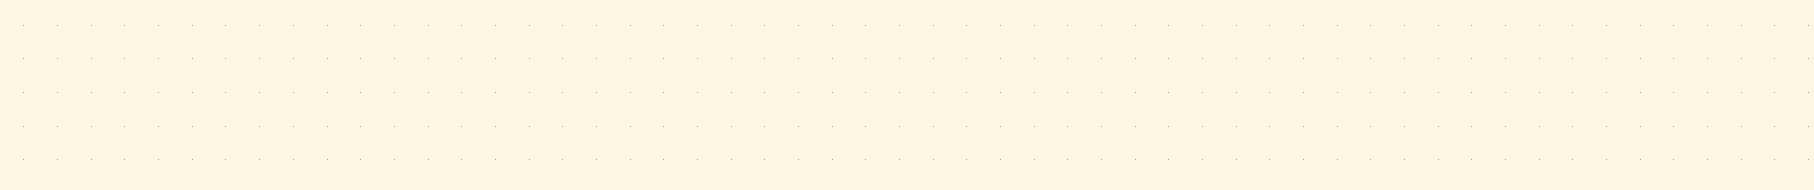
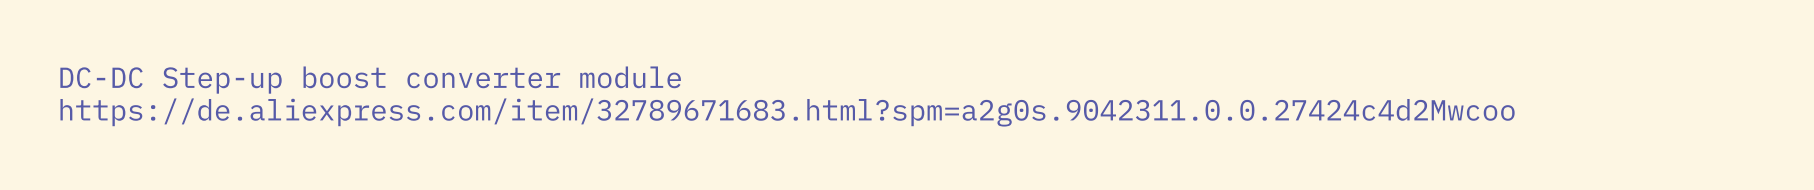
text: none -> DC-DC Step-up boost converter module (370, 80)
text: none -> https://de.aliexpress.com/item/32789671683.html?spm=a2g0s.9042311.0.0.27424c4d2Mwcoo (787, 112)

